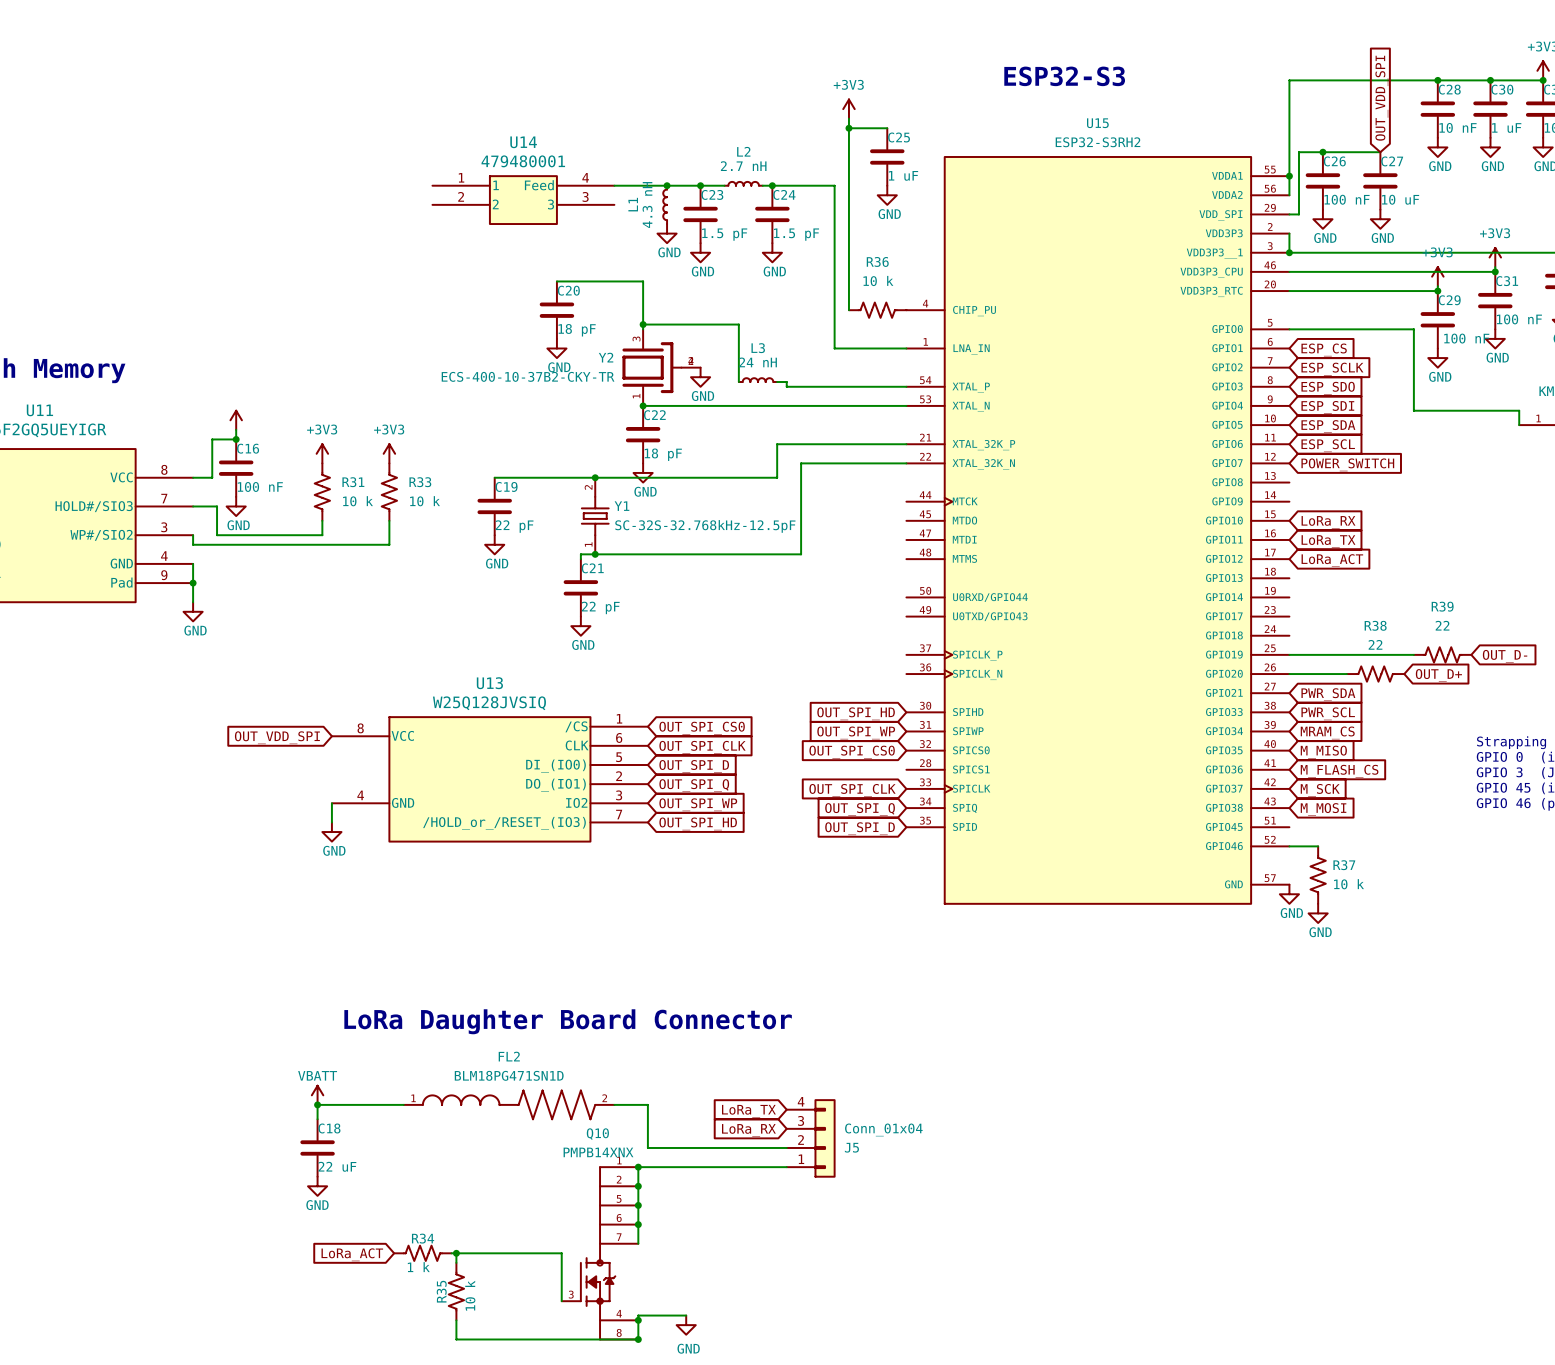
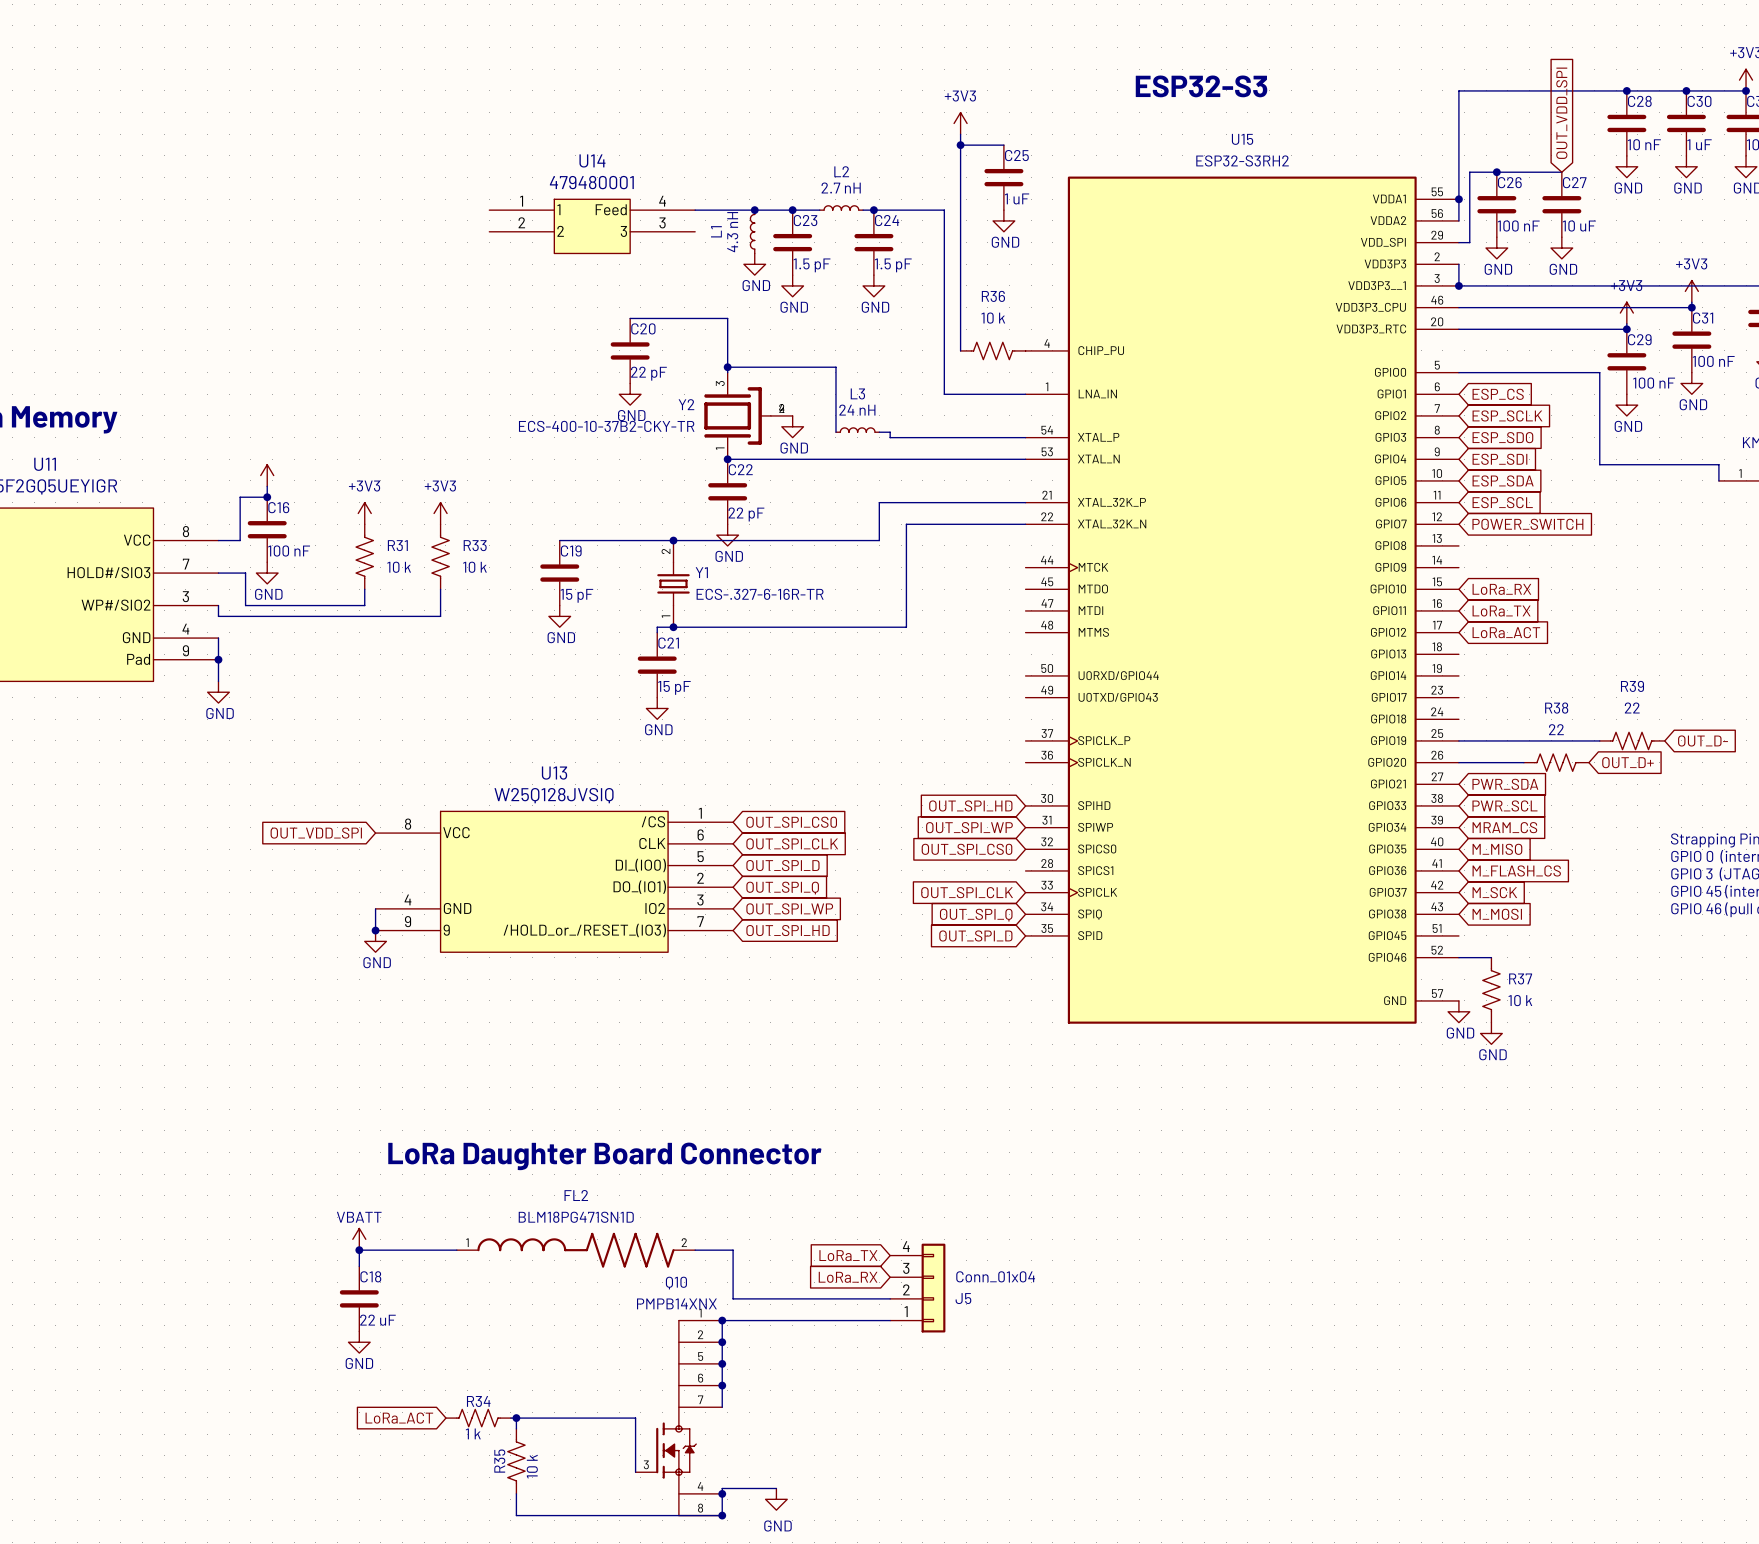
C20 value: 18 pF (577, 330) -> 22 pF (648, 373)
C22 value: 18 pF (663, 454) -> 22 pF (746, 514)
C19 value: 22 pF (514, 526) -> 15 pF (576, 595)
Y1 value: SC-32S-32.768kHz-12.5pF (705, 526) -> ECS-.327-6-16R-TR (760, 594)
C21 value: 22 pF (600, 607) -> 15 pF (674, 687)
U13 symbol: [331, 717, 648, 842] -> [375, 811, 734, 953]
junction: none -> (375, 930)

